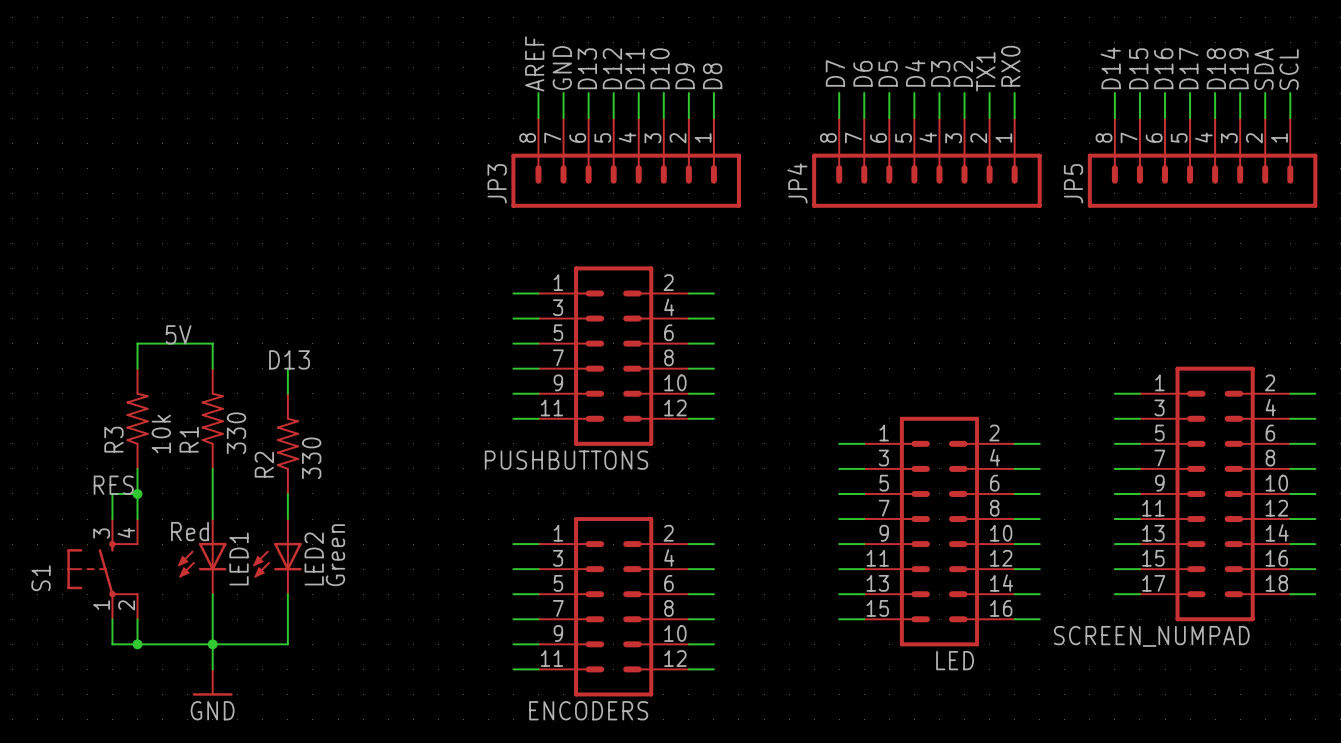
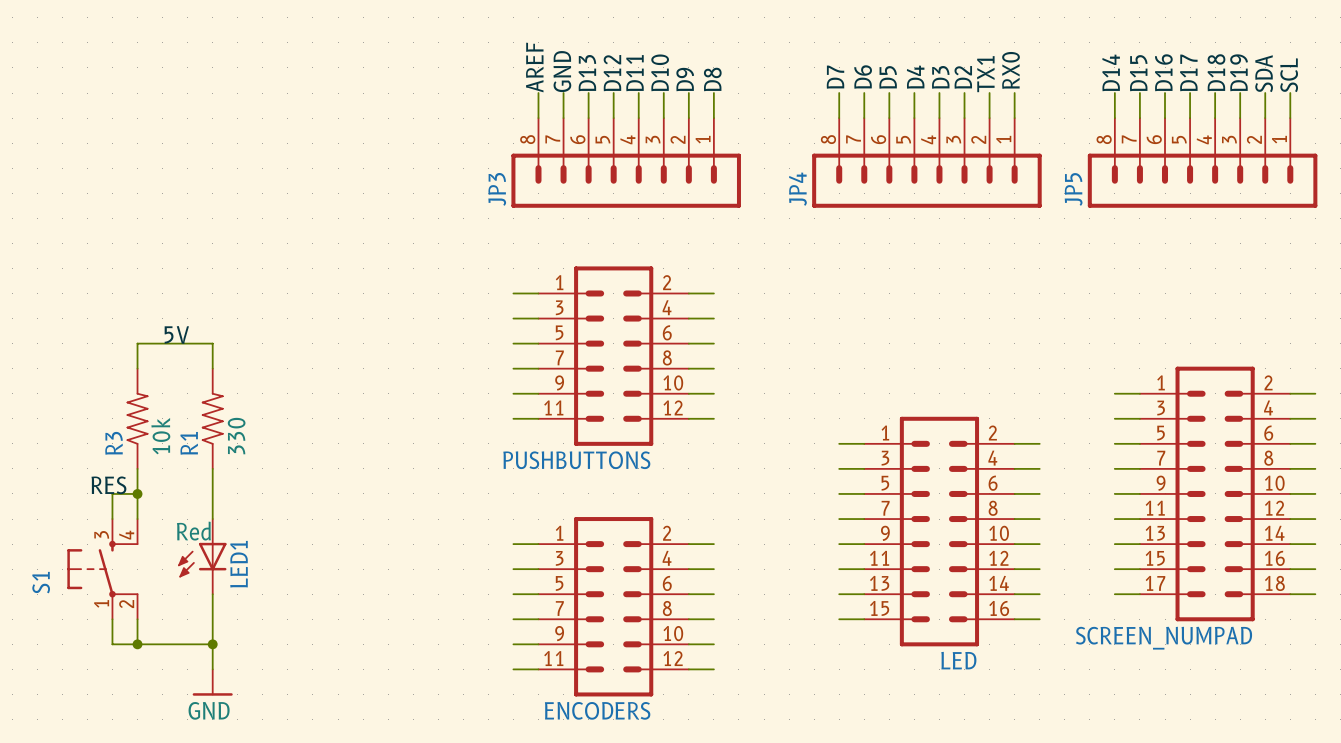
label: D13 (289, 359) -> none
wire: (287, 368) (287, 393) -> none
R2: 330 (287, 443) -> none
wire: (287, 493) (287, 519) -> none
LED2: Green (277, 556) -> none
wire: (287, 594) (287, 644) (212, 644) -> none

